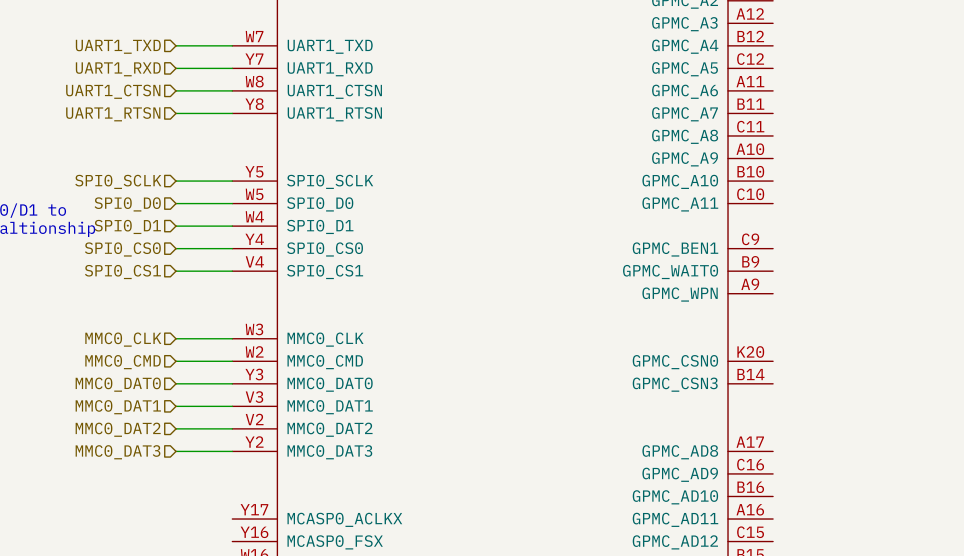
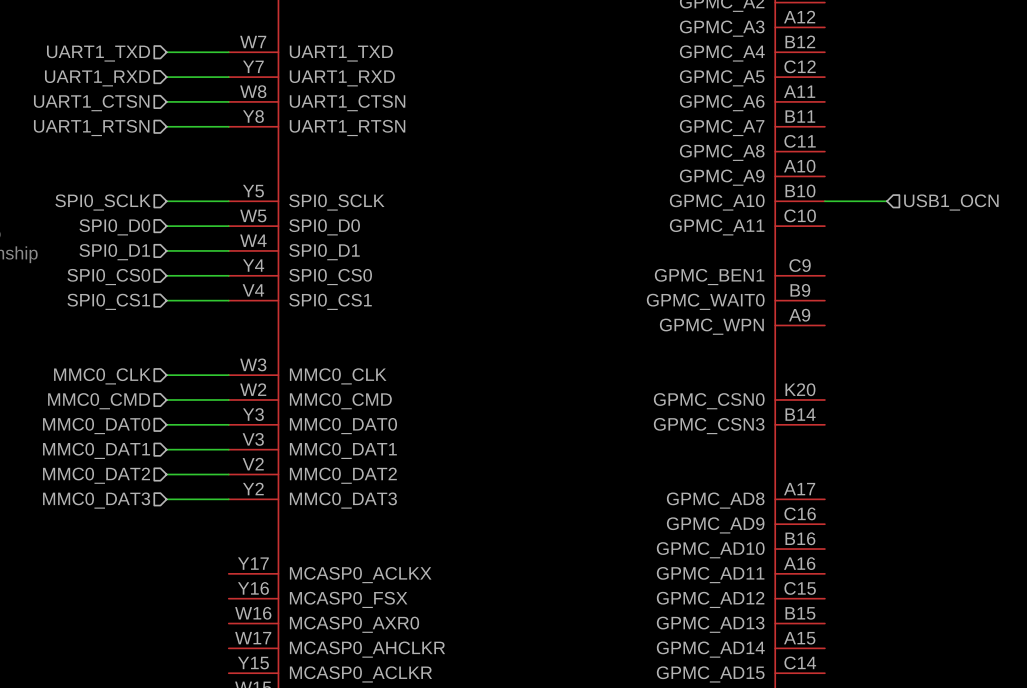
wire: none -> (824, 201) (886, 201)
hierarchical label: none -> USB1_OCN (951, 202)

